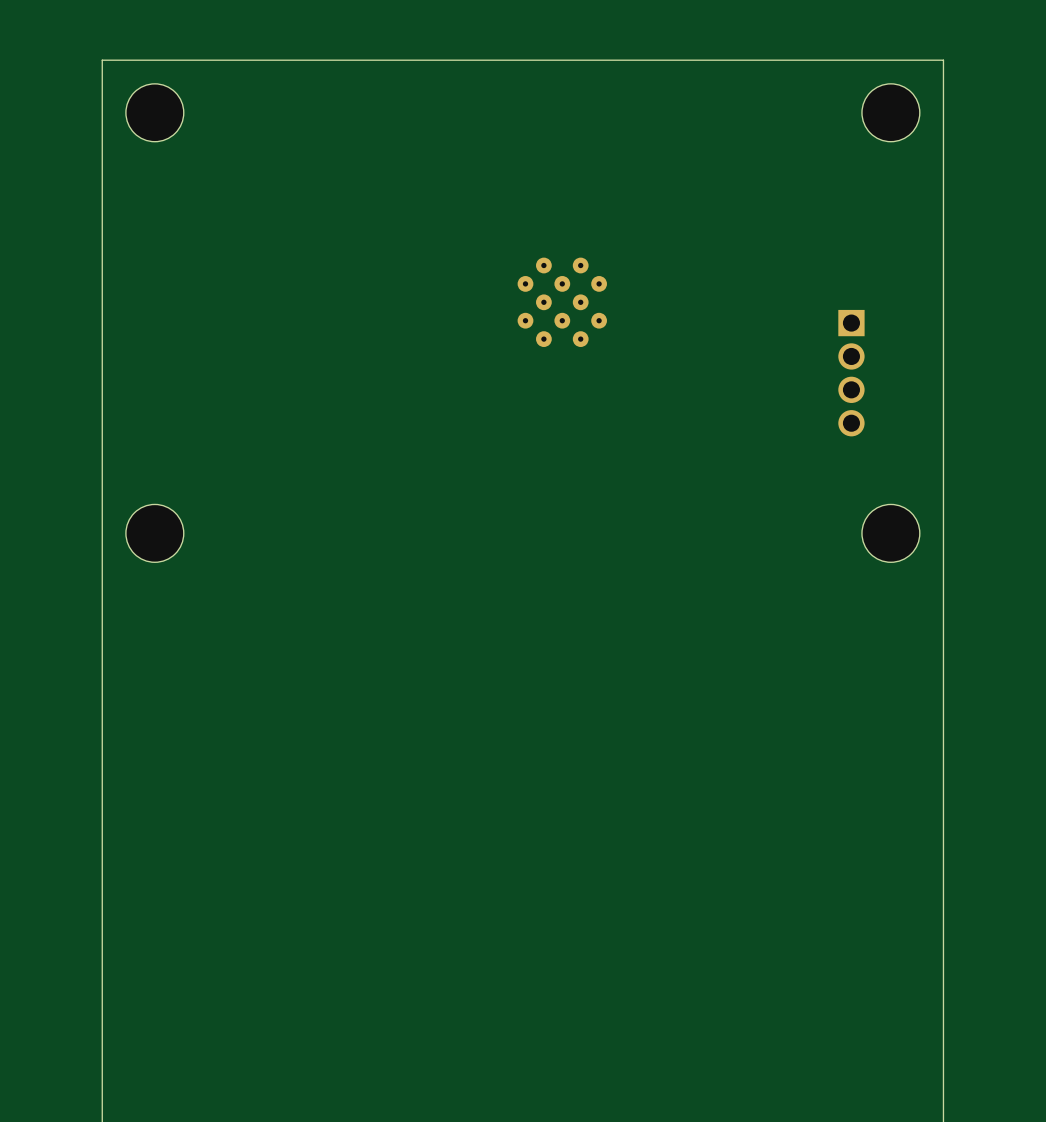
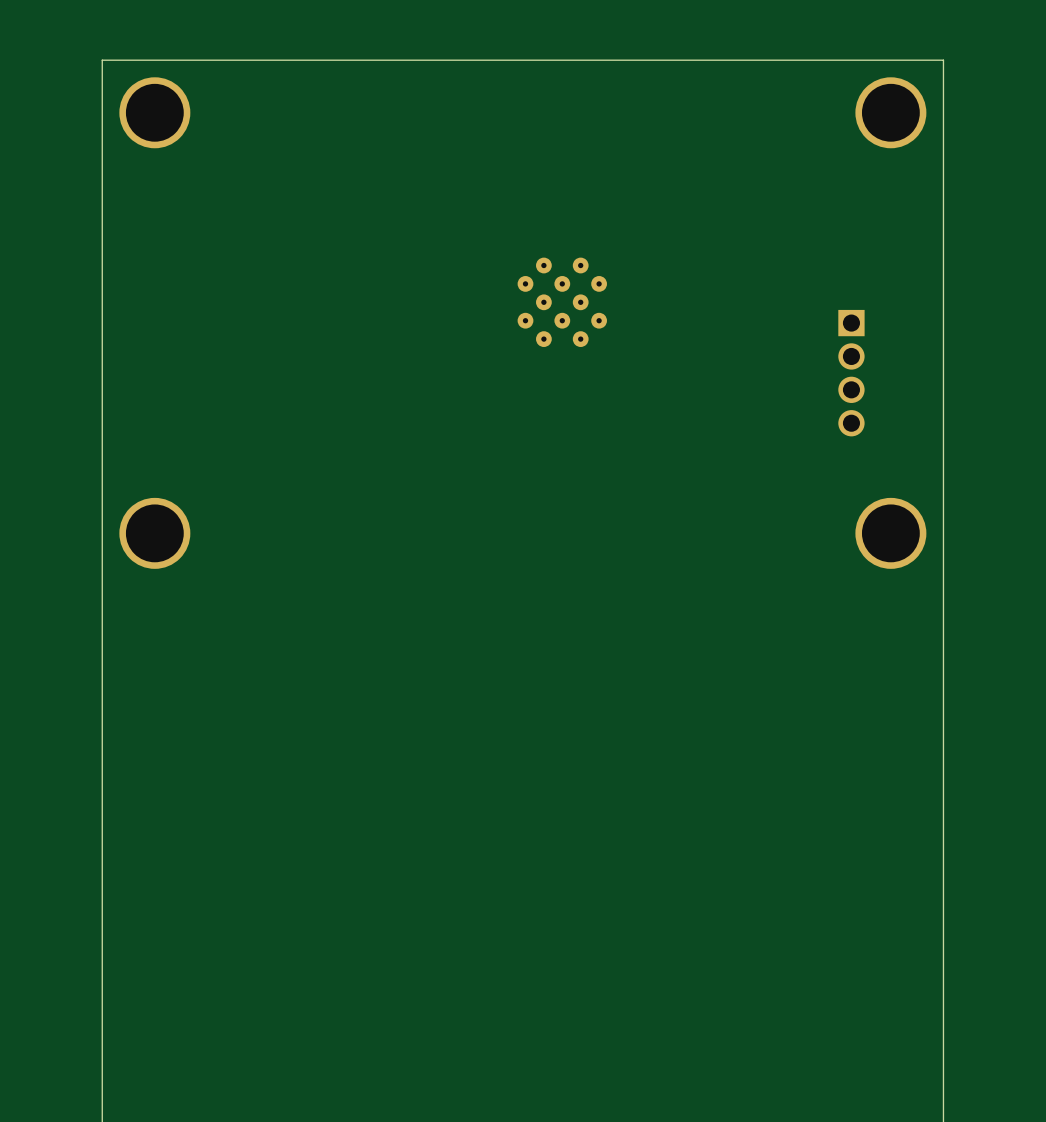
part footprint: [125, 83, 184, 142] -> [119, 77, 191, 149]
part footprint: [861, 83, 920, 142] -> [855, 77, 927, 149]
part footprint: [125, 504, 184, 563] -> [119, 497, 191, 569]
part footprint: [861, 504, 920, 563] -> [855, 497, 927, 569]

